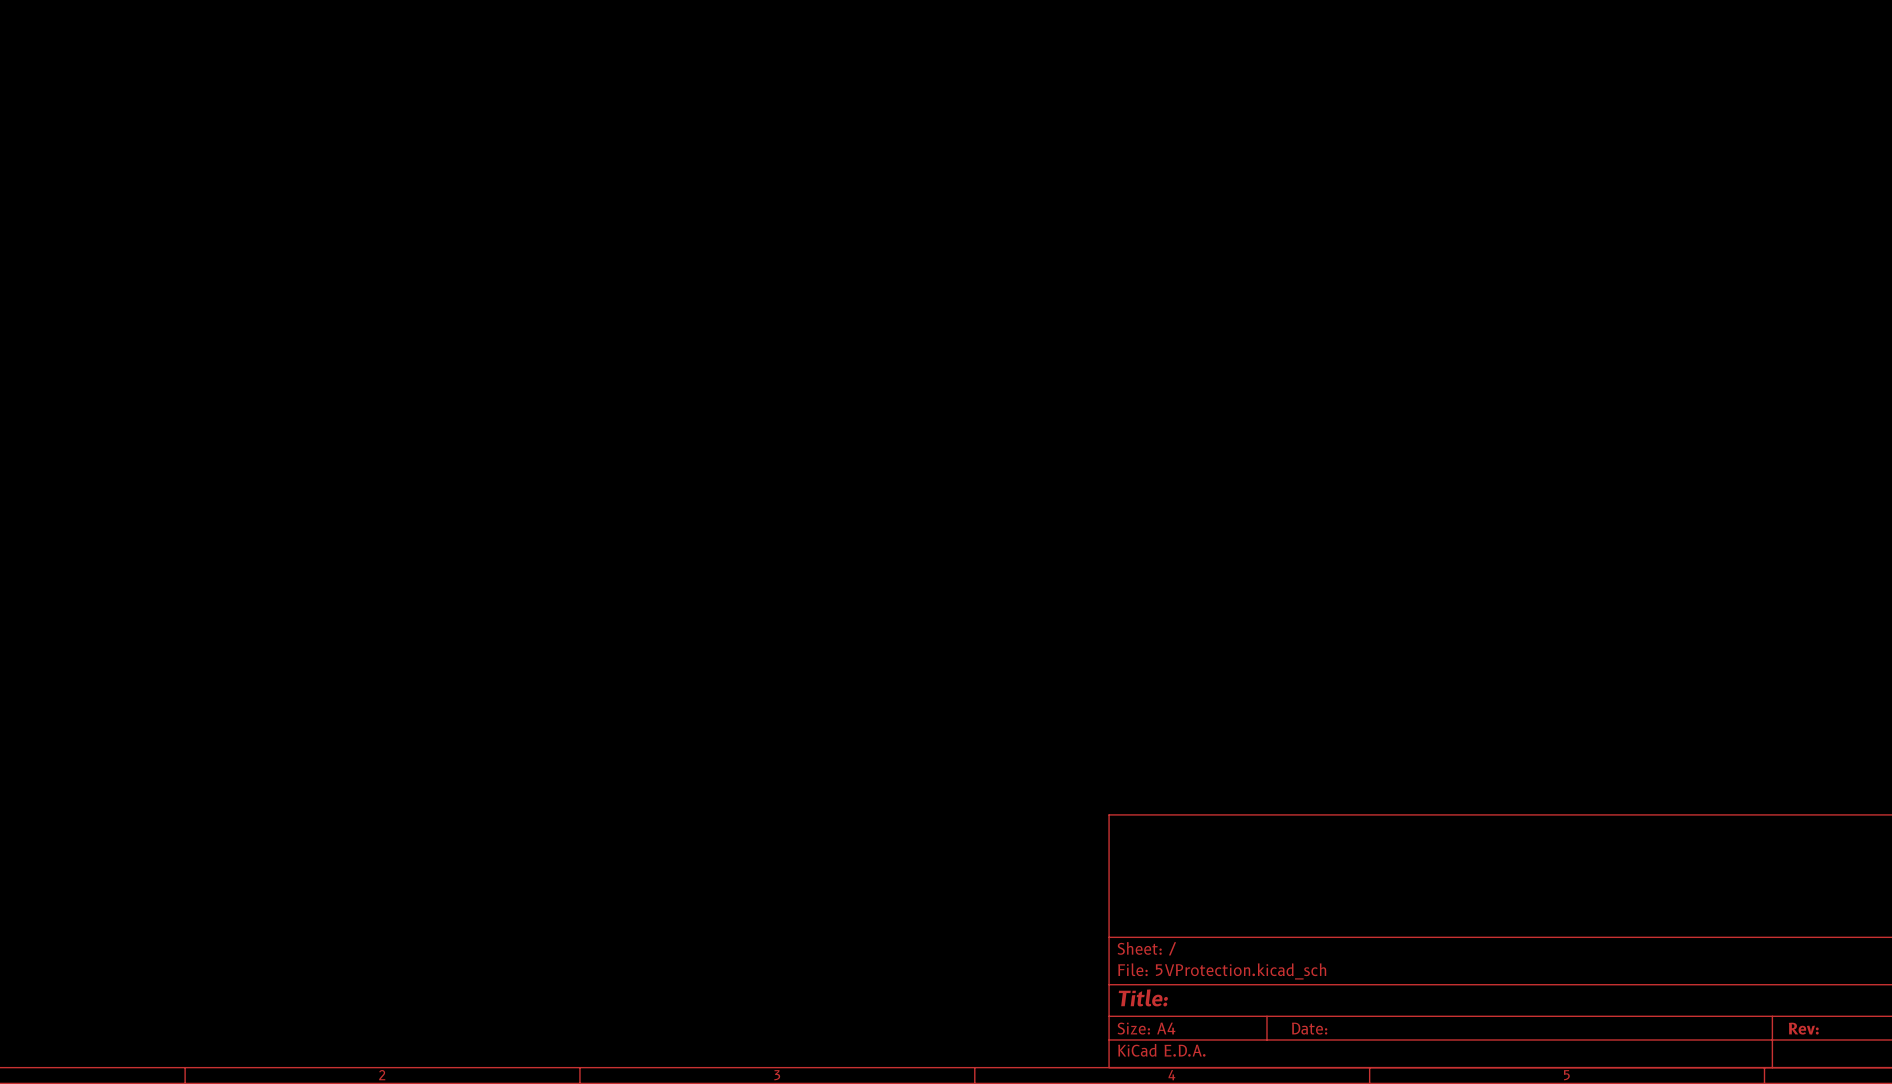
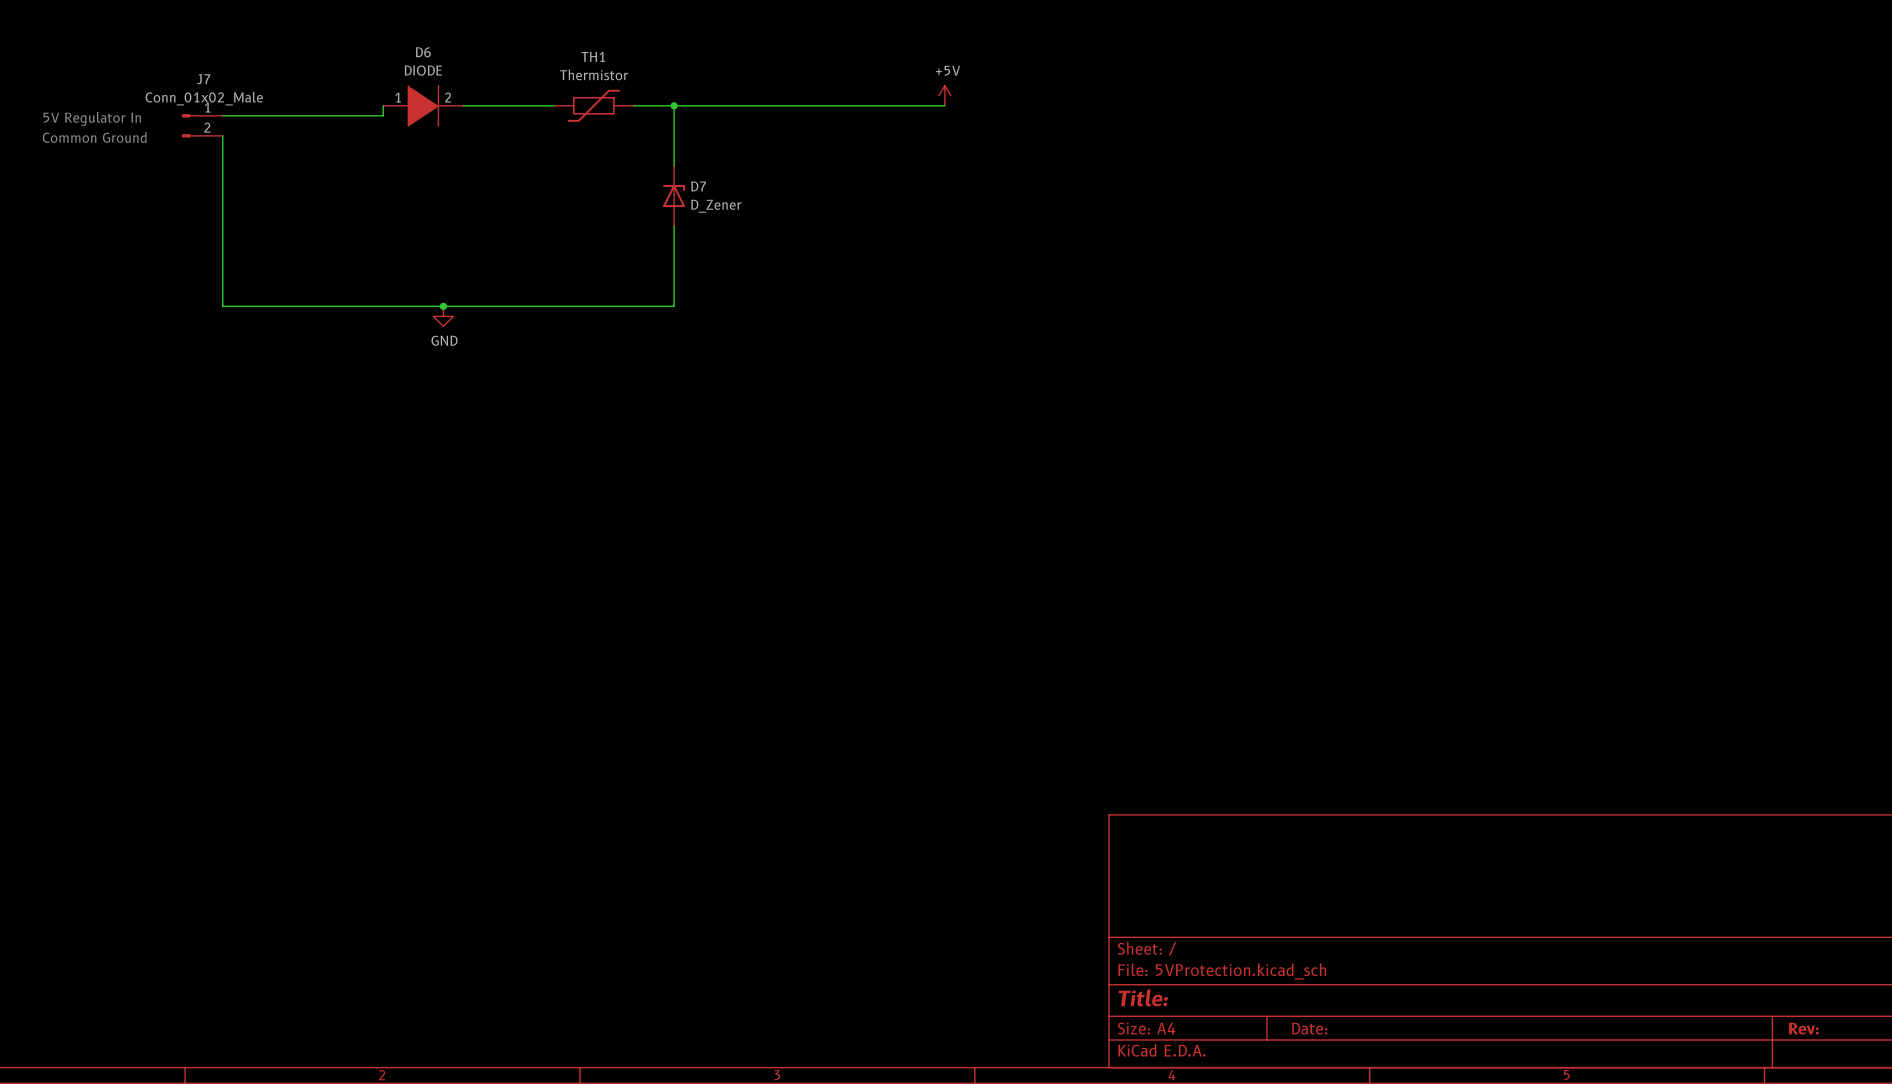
power symbol: none -> +5V (944, 95)
wire: none -> (383, 105) (383, 115) (222, 115)
D6: none -> DIODE (423, 105)
wire: none -> (463, 105) (553, 105)
TH1: none -> Thermistor (593, 105)
wire: none -> (633, 105) (944, 105)
wire: none -> (674, 105) (674, 165)
junction: none -> (674, 105)
text: none -> 5V Regulator In (92, 119)
J7: none -> Conn_01x02_Male (202, 125)
wire: none -> (222, 135) (222, 306) (674, 306) (674, 226)
text: none -> Common Ground (94, 137)
D7: none -> D_Zener (674, 196)
junction: none -> (443, 306)
power symbol: none -> GND (443, 316)

